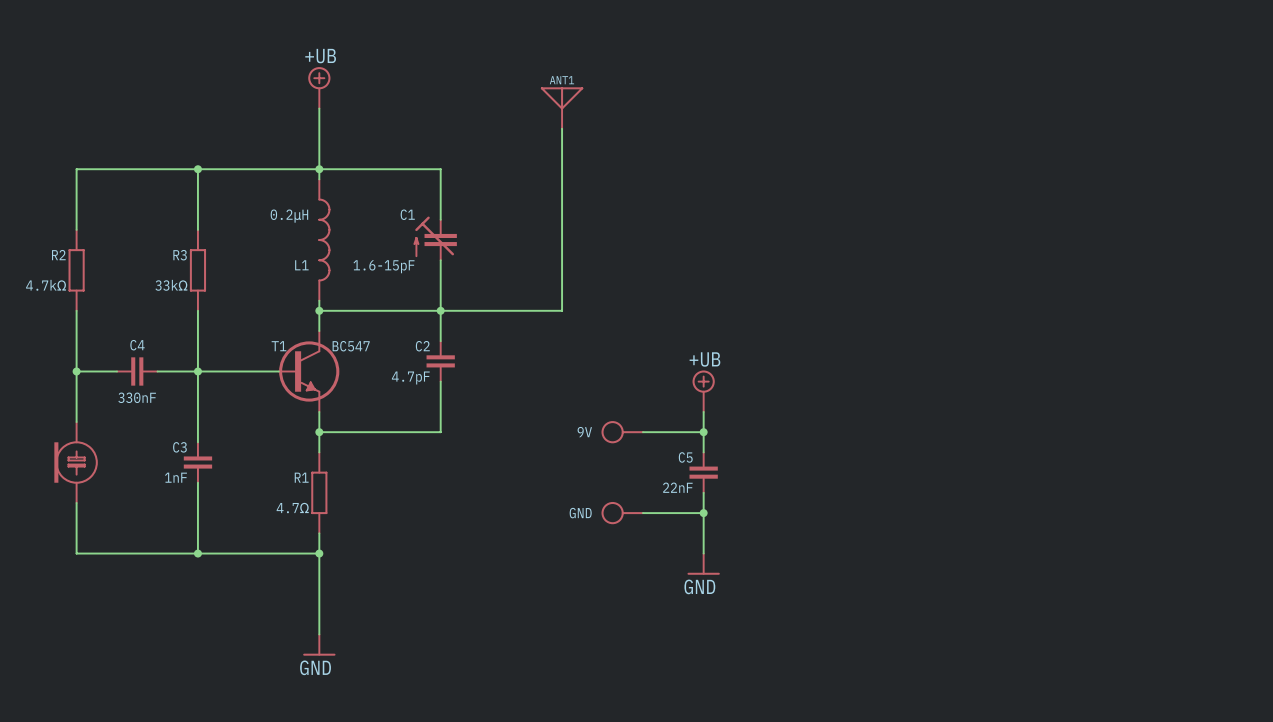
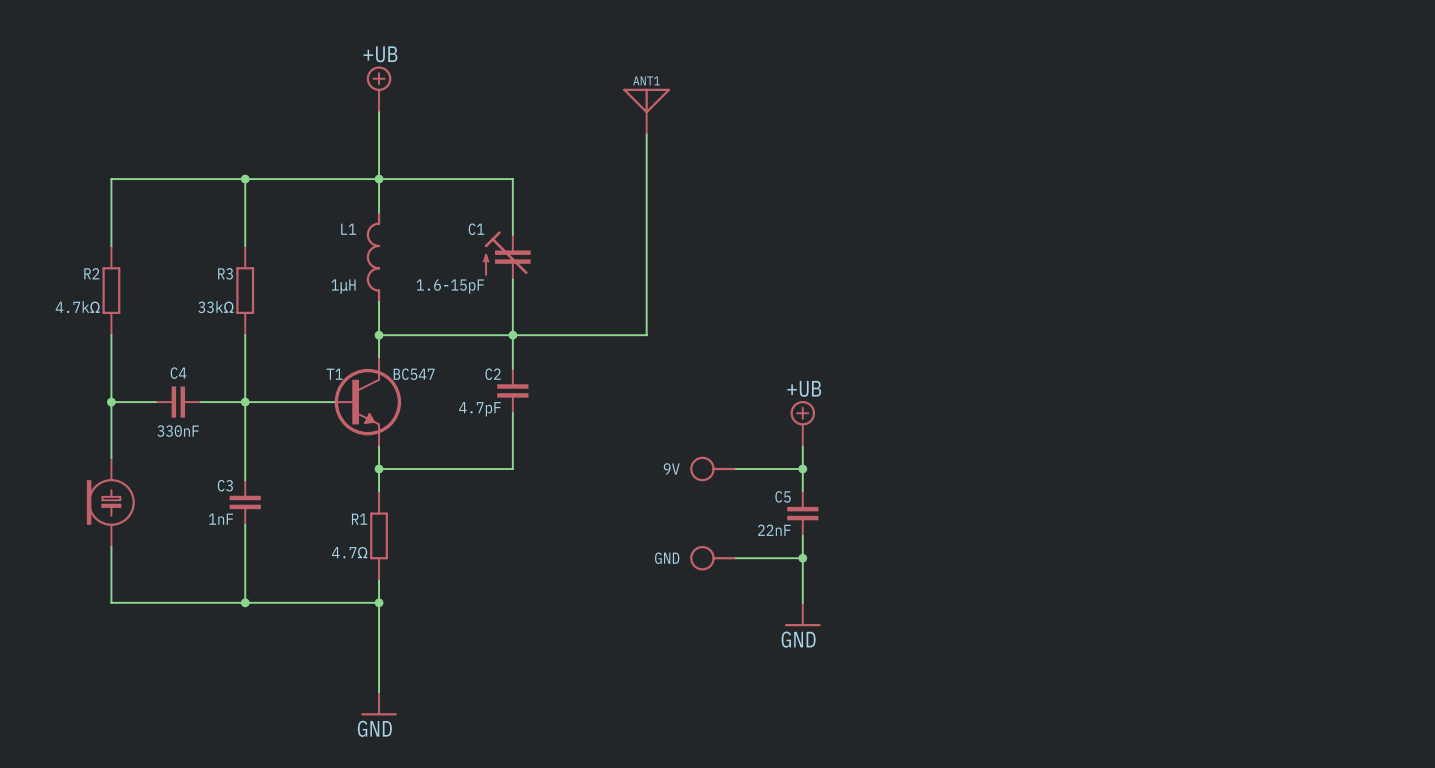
L1 symbol: [318, 179, 331, 301] -> [366, 211, 381, 303]
L1 value: 0.2μH (289, 216) -> 1μH (343, 286)
L1 name position: L1 (301, 265) -> L1 (348, 229)

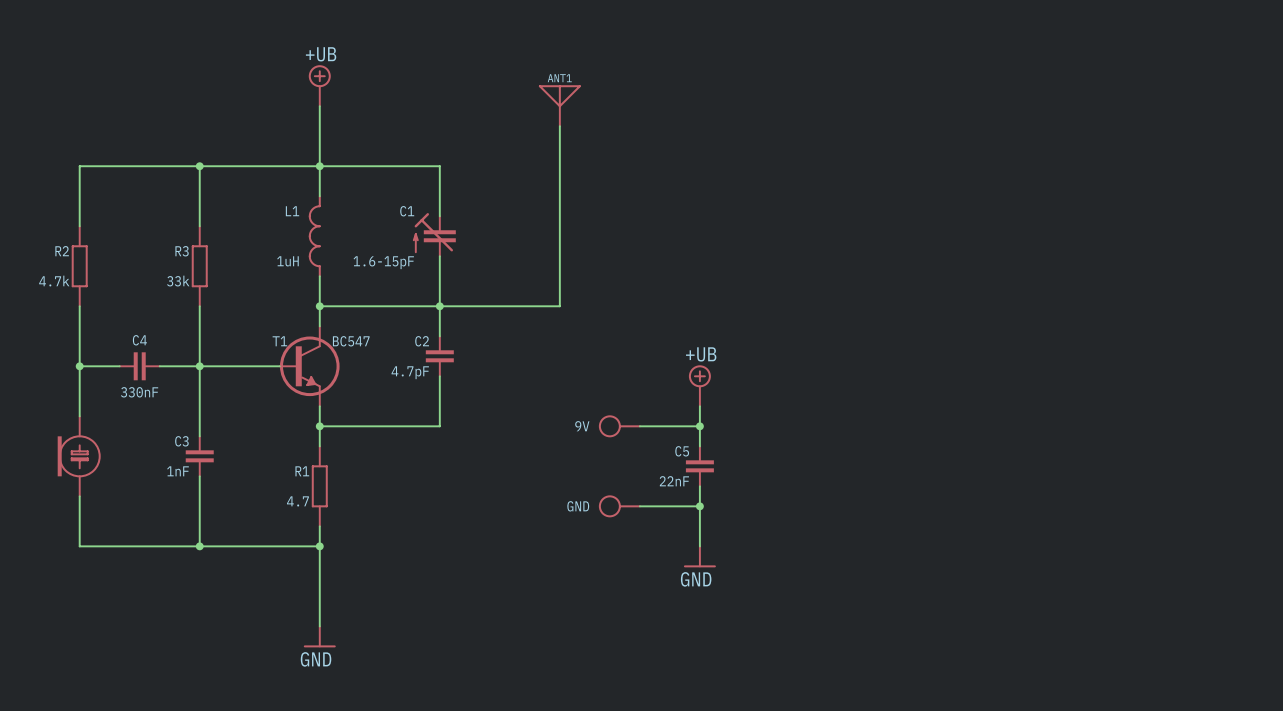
L1 value: 1μH (343, 286) -> 1uH (287, 261)
R2 value: 4.7kΩ (77, 307) -> 4.7k (54, 281)
R3 value: 33kΩ (215, 307) -> 33k (178, 281)
R1 value: 4.7Ω (349, 552) -> 4.7 (297, 501)

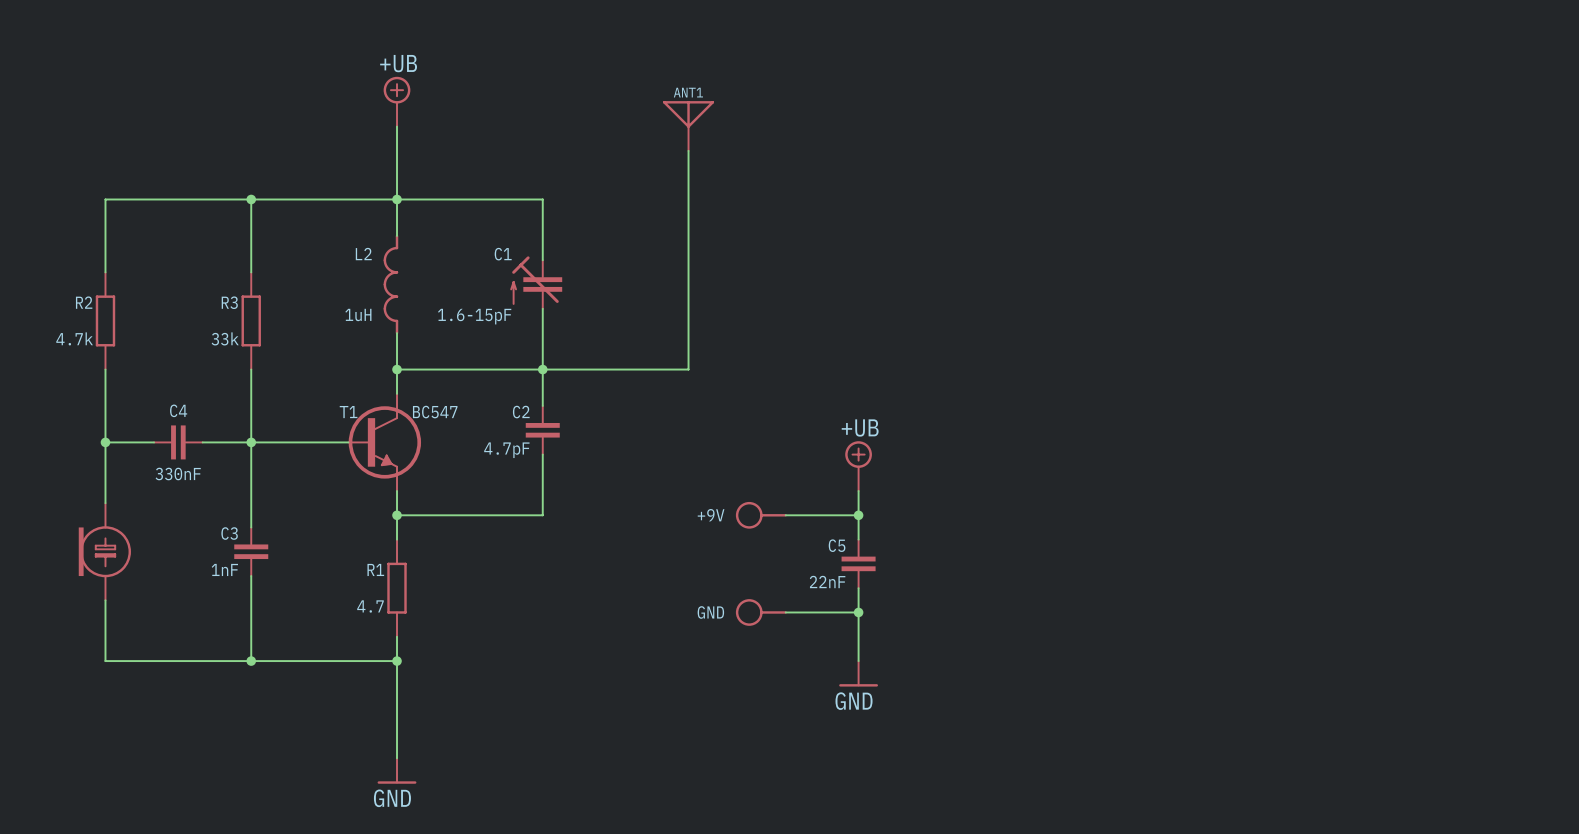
L1 name: L1 (292, 211) -> L2 (363, 254)
9V name: 9V (582, 426) -> +9V (711, 515)

